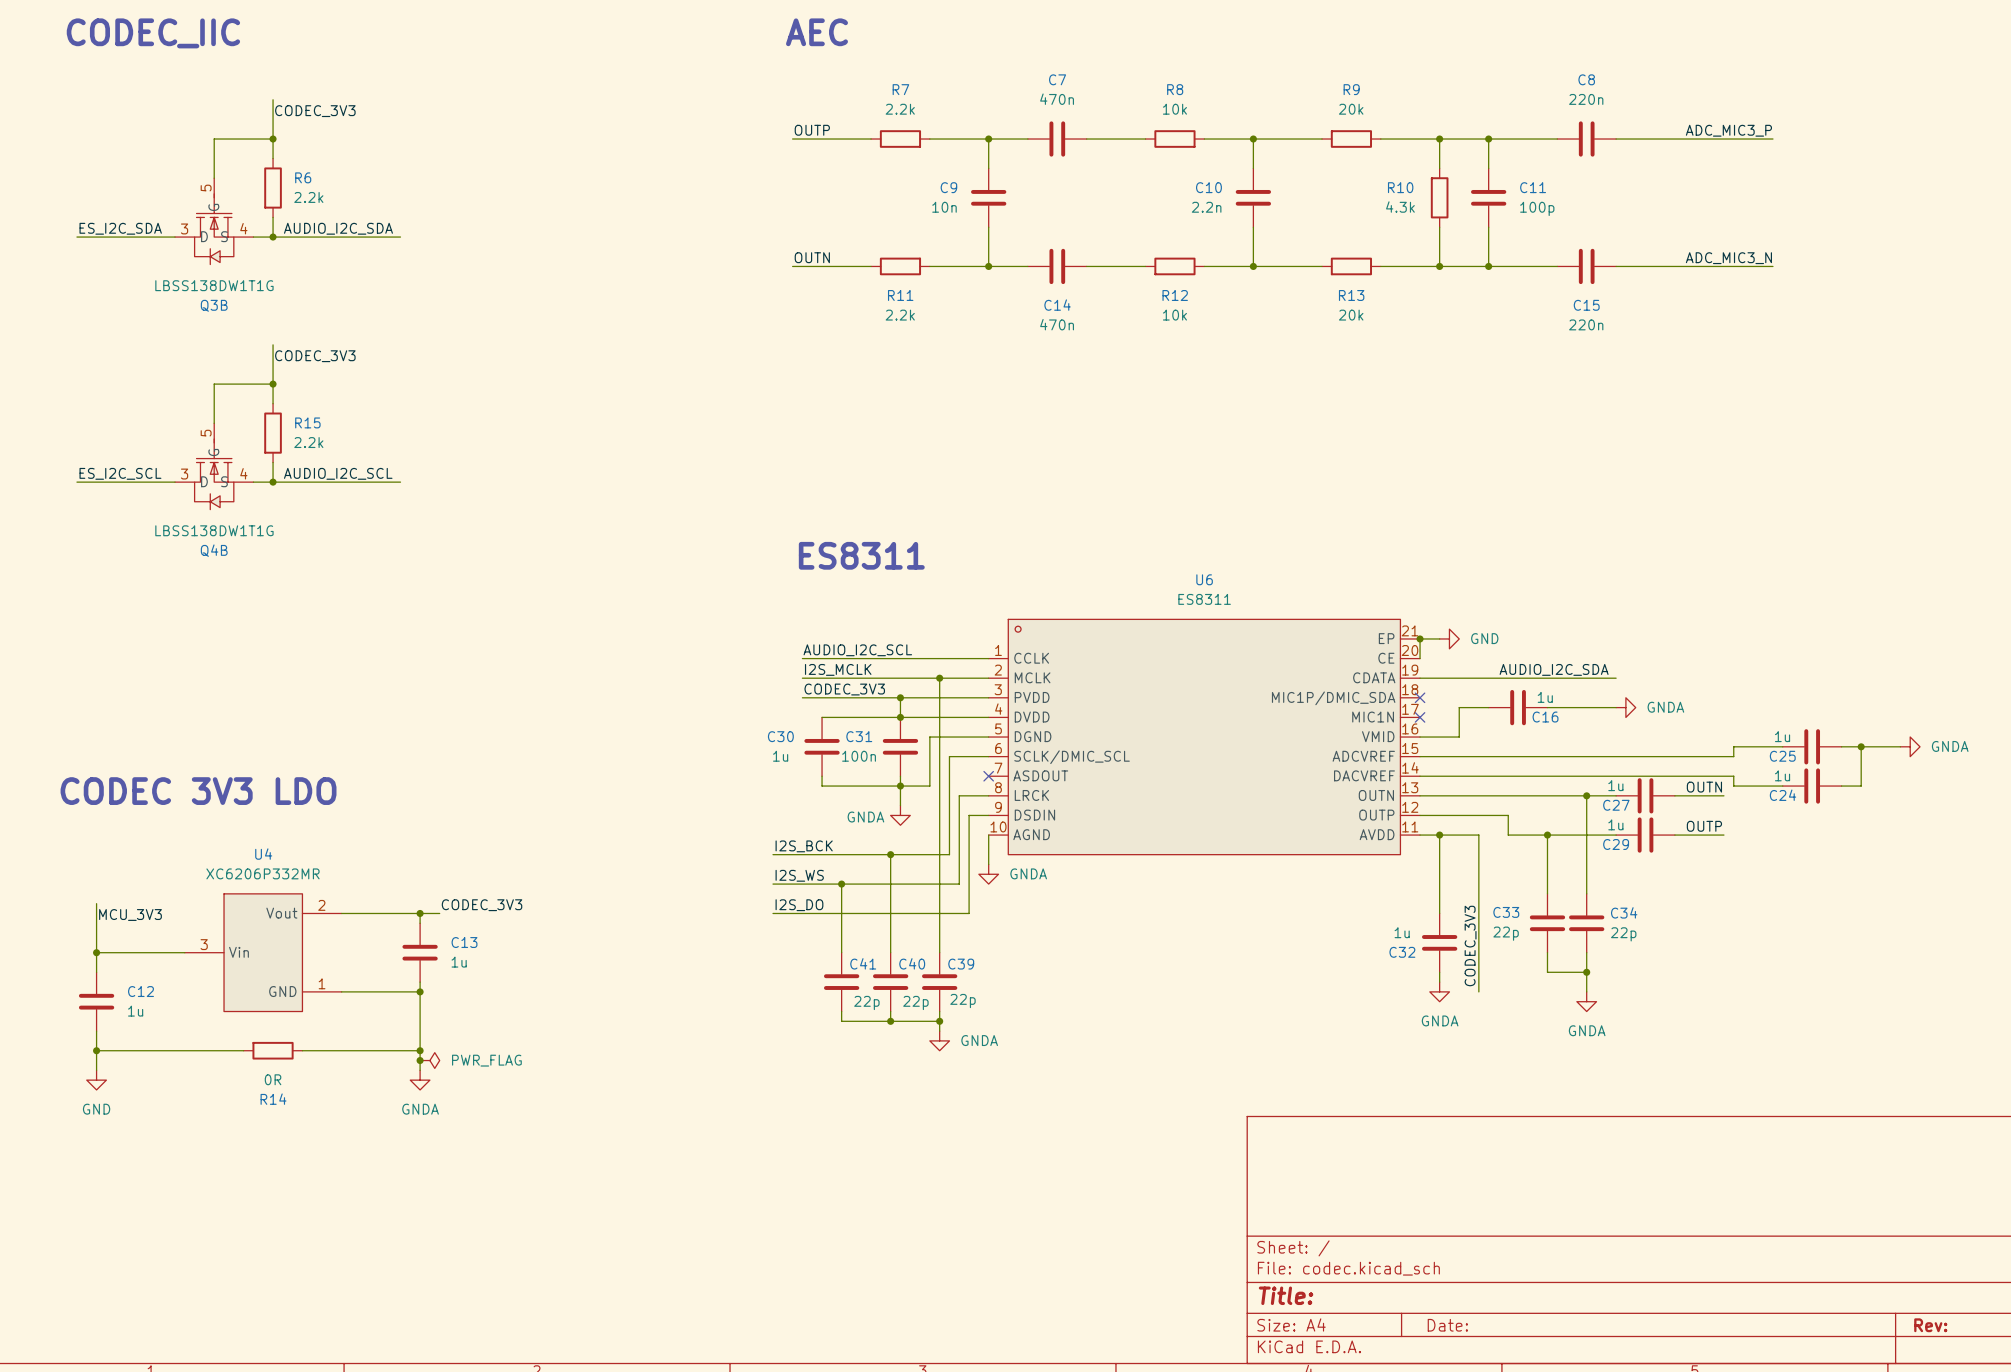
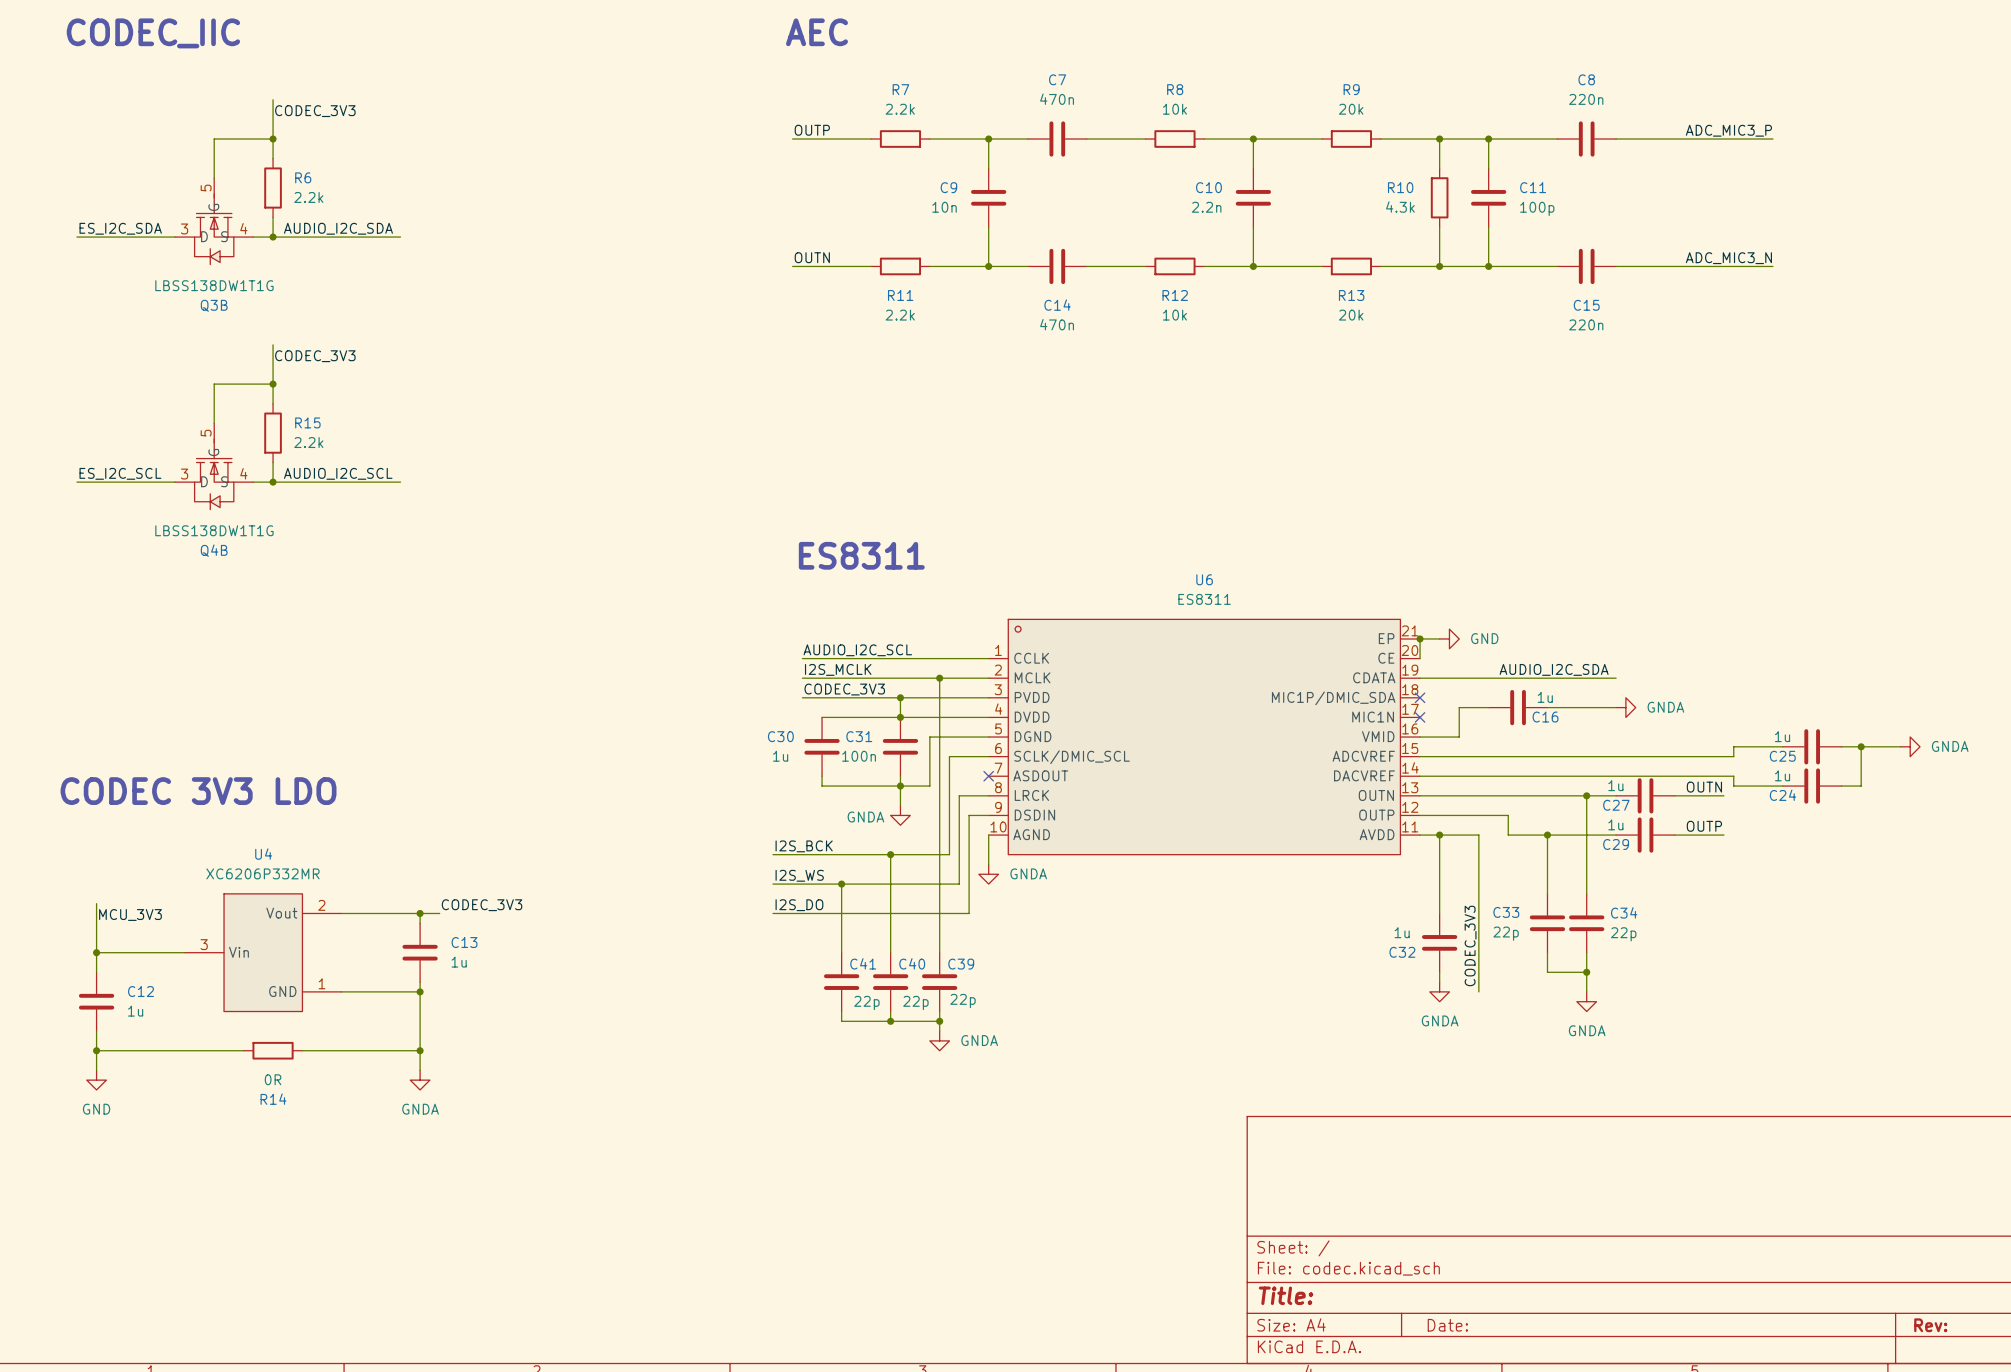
junction: (420, 1060) -> none
power symbol: PWR_FLAG (429, 1060) -> none

